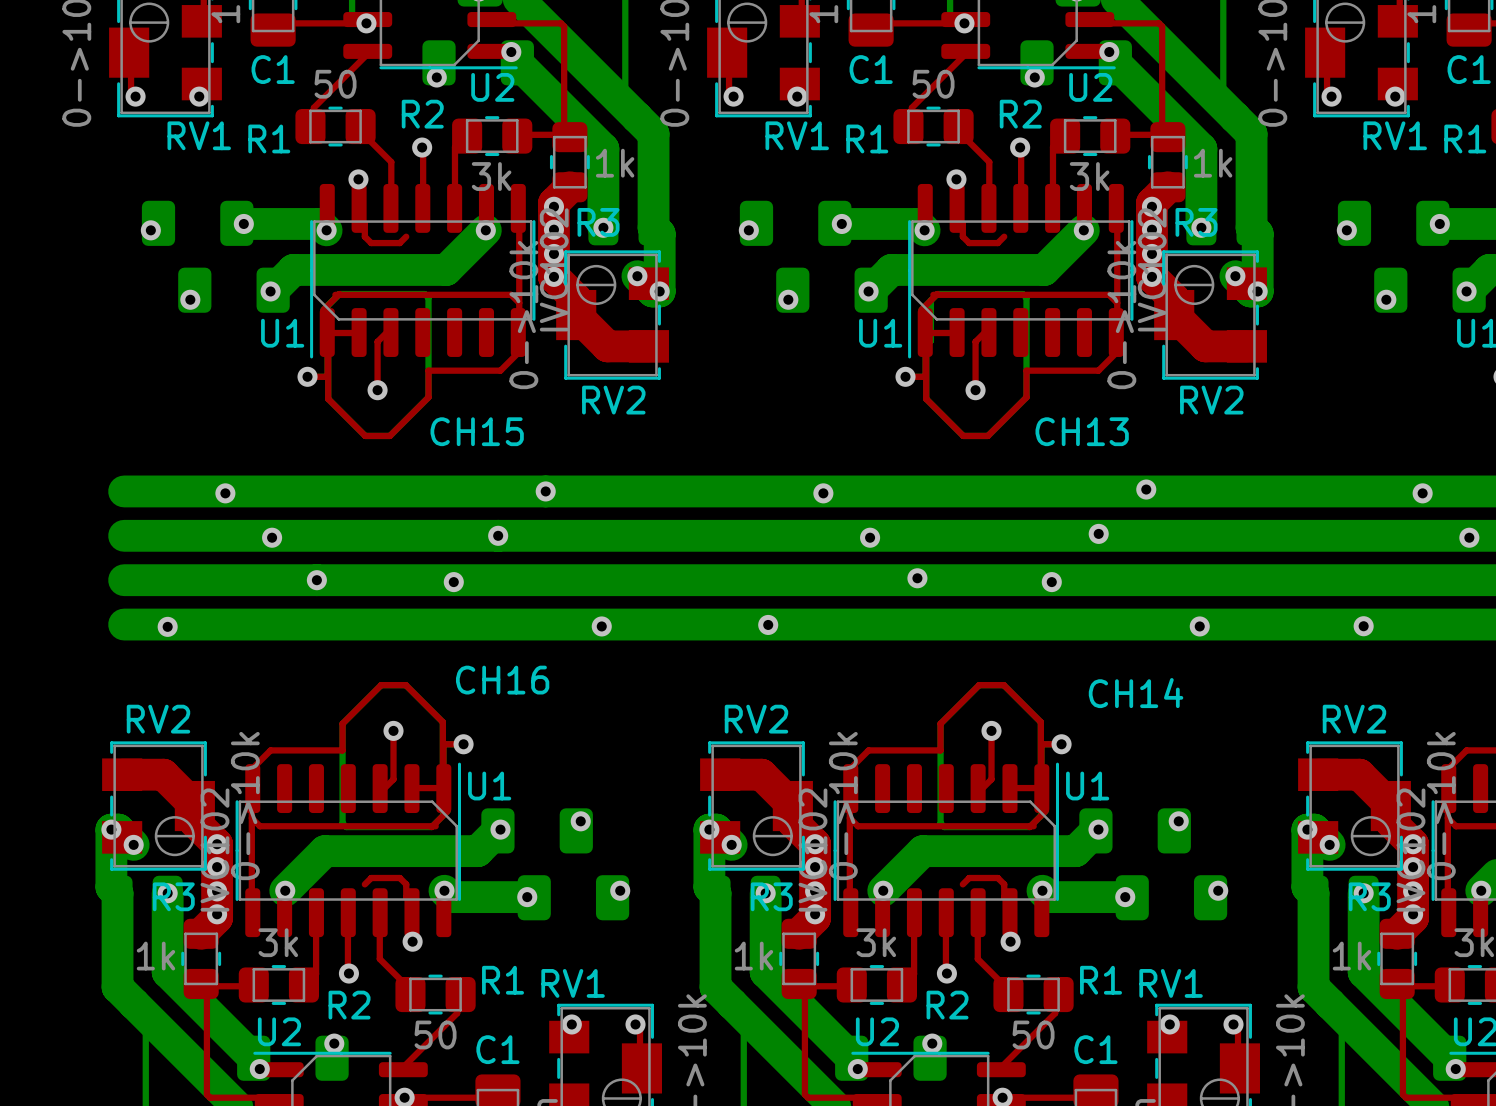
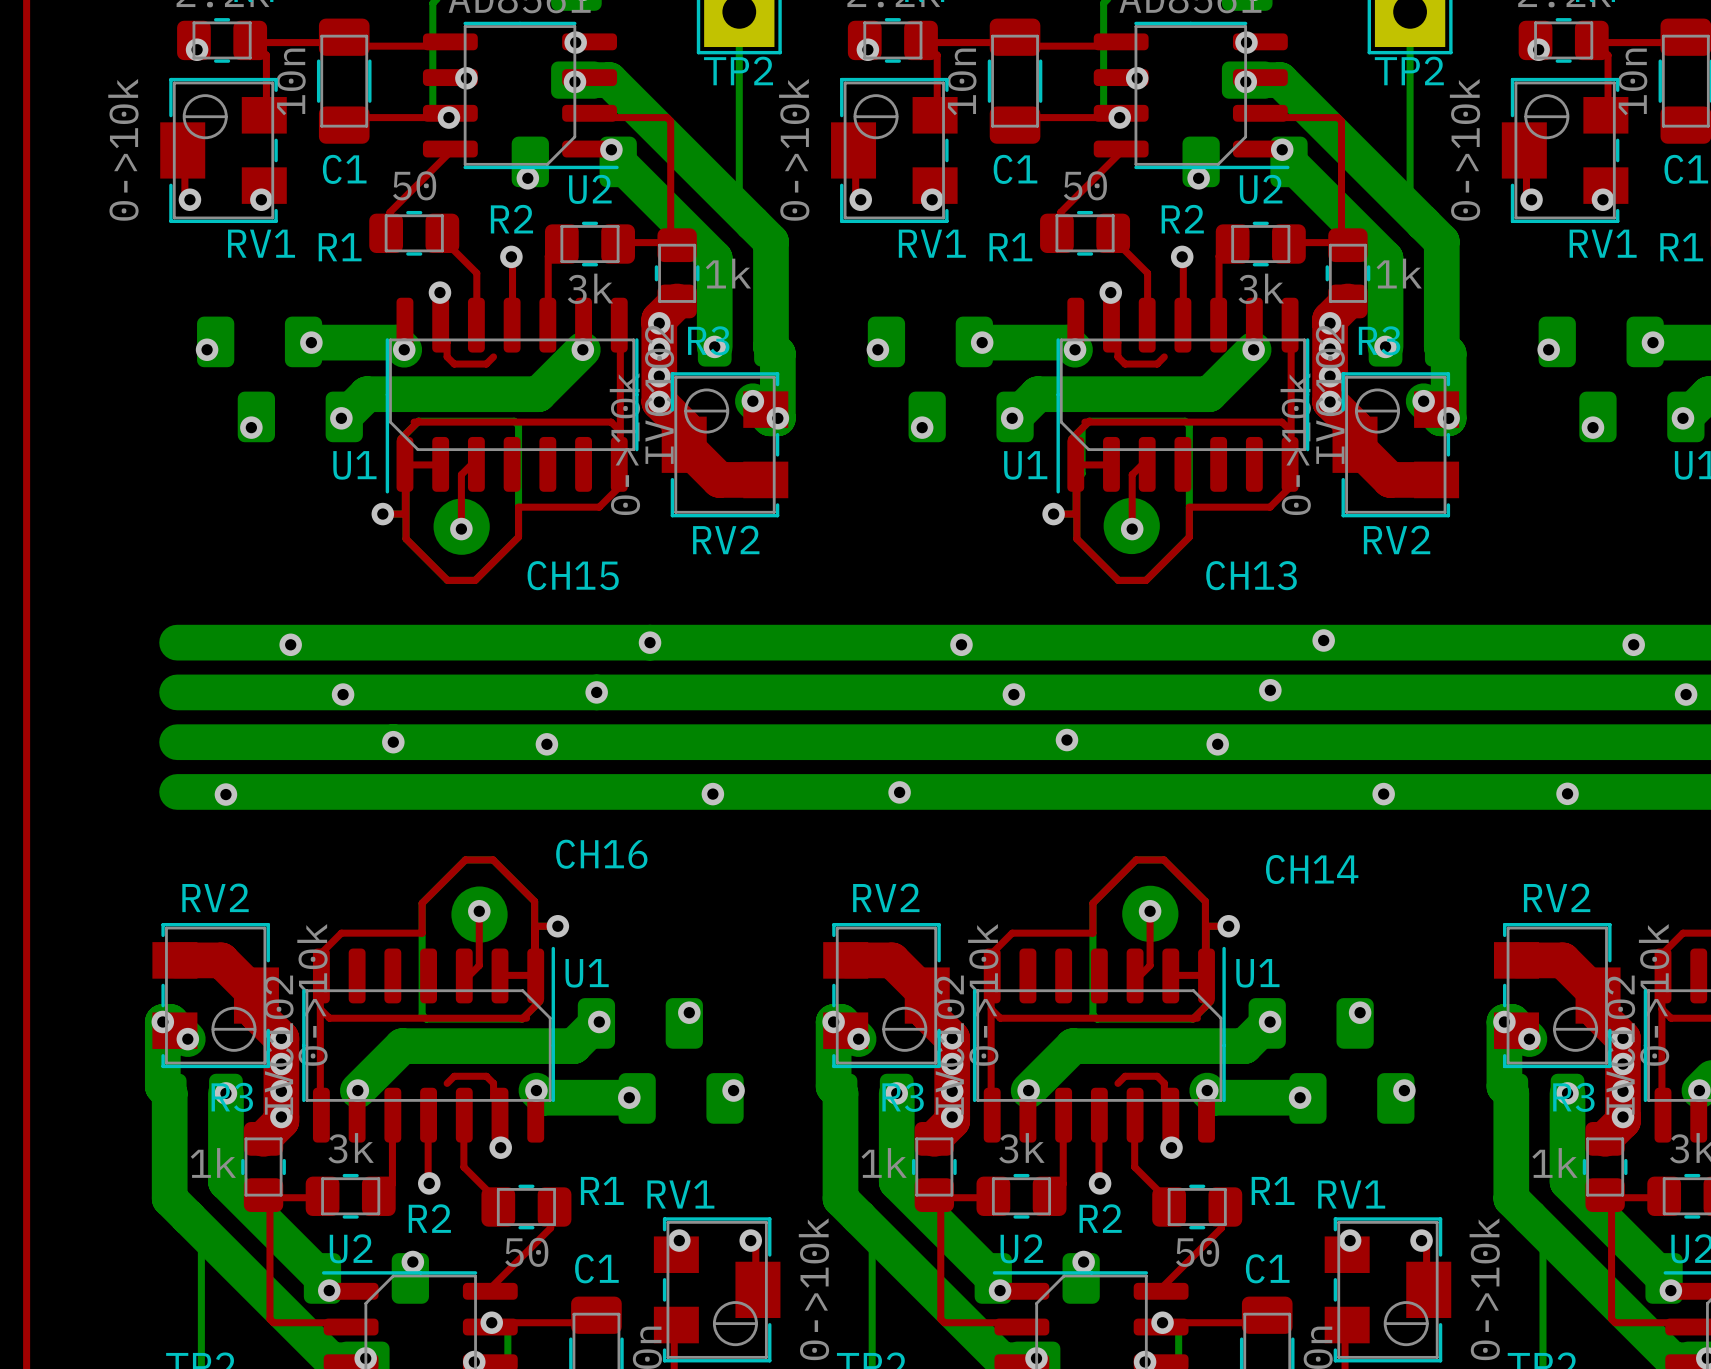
part: none -> (1131, 525)
part: none -> (461, 526)
part: none -> (479, 914)
part: none -> (1150, 913)

